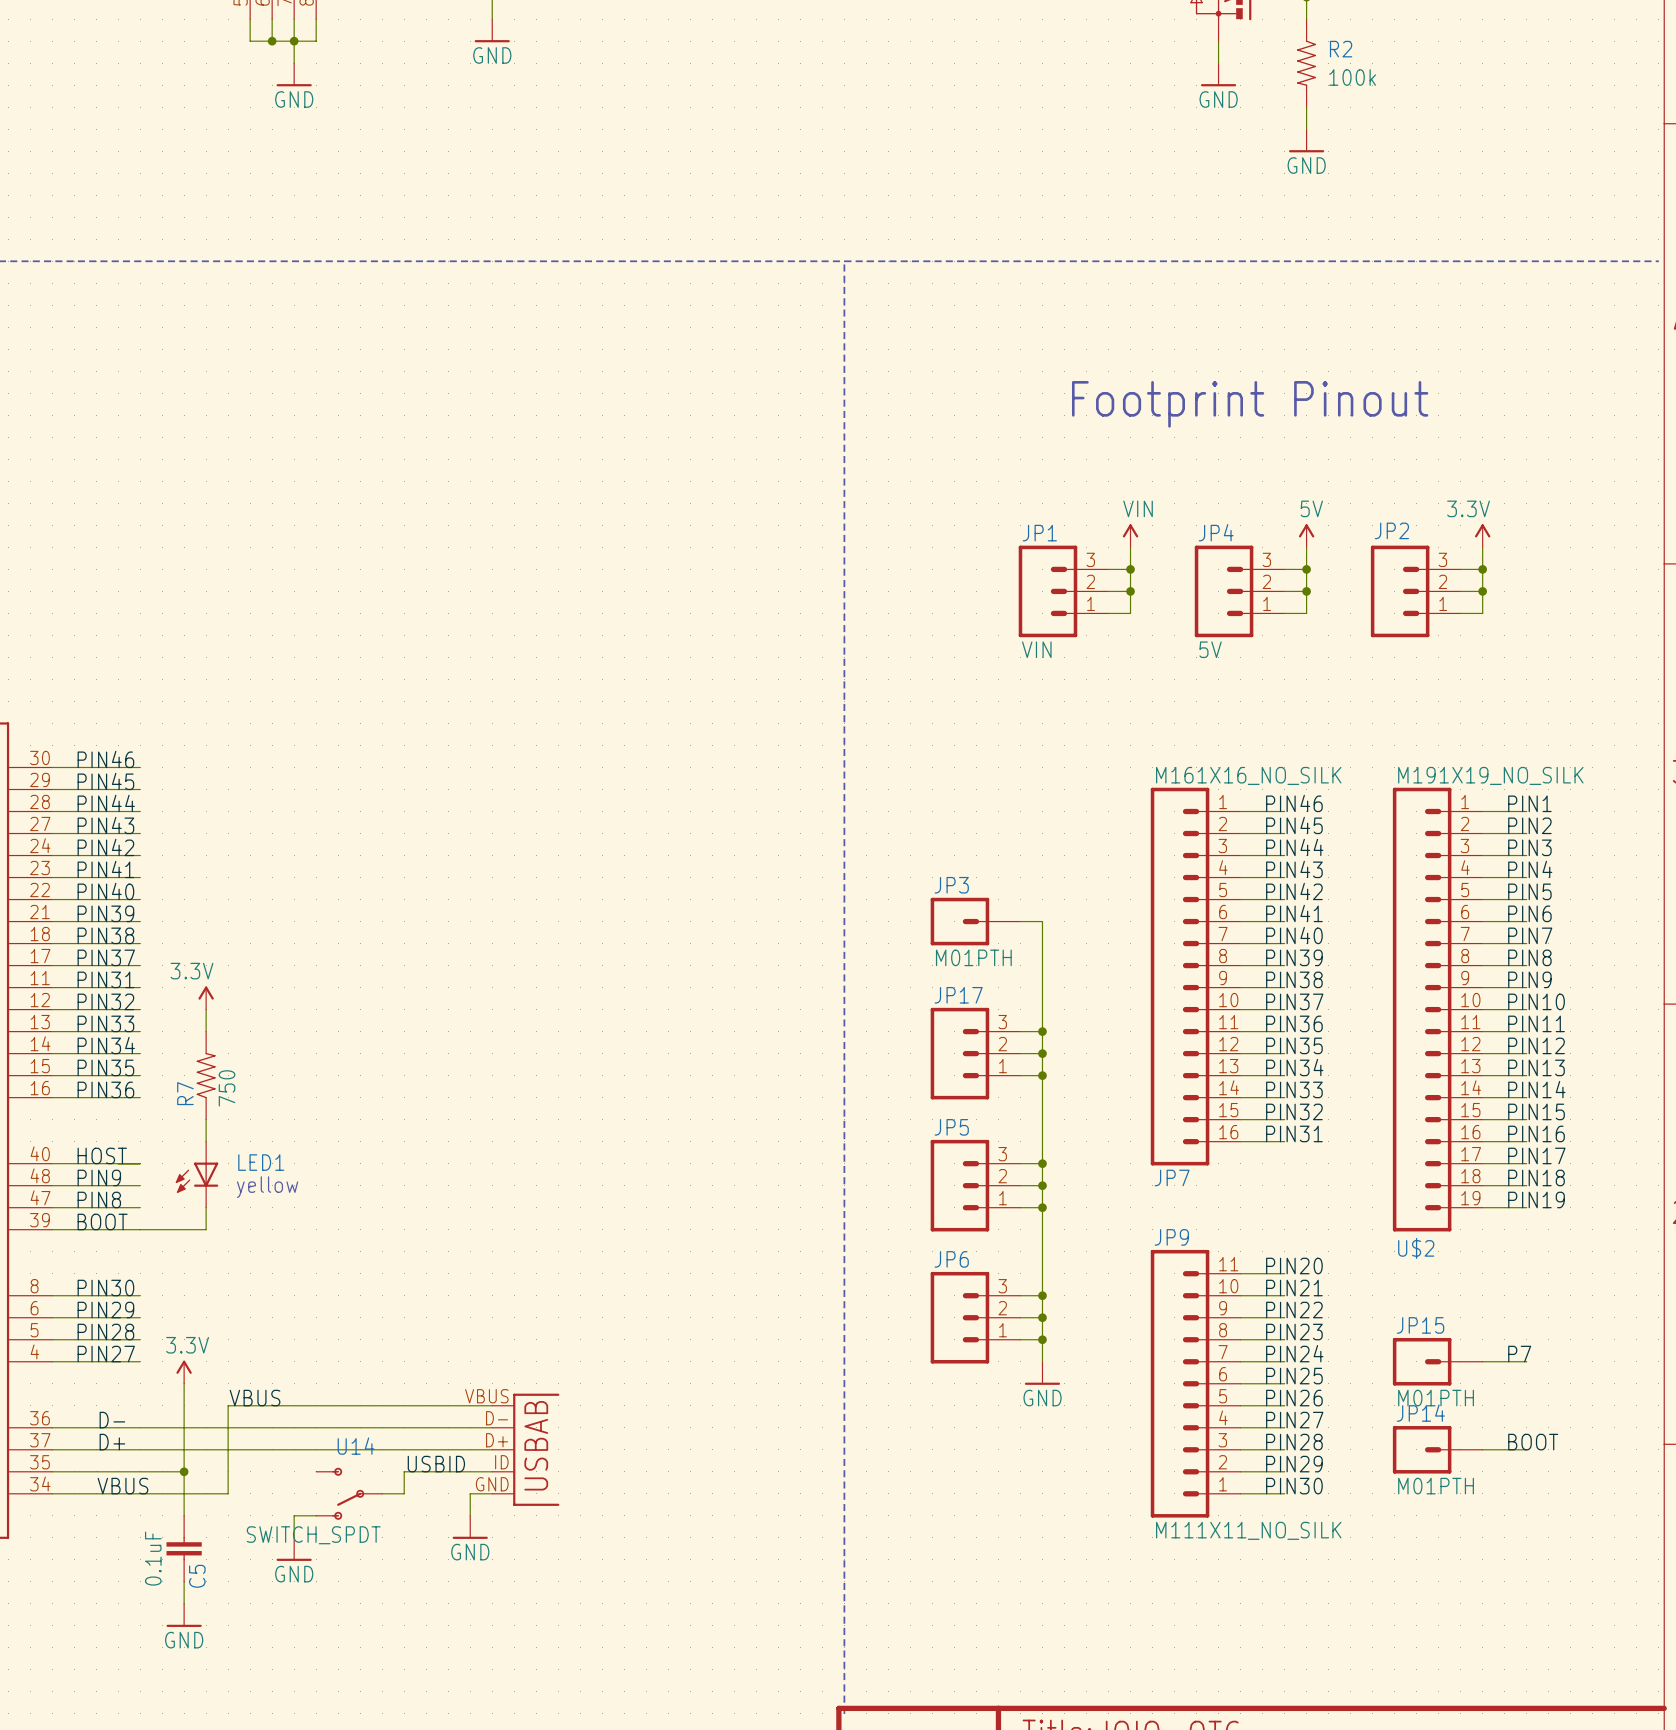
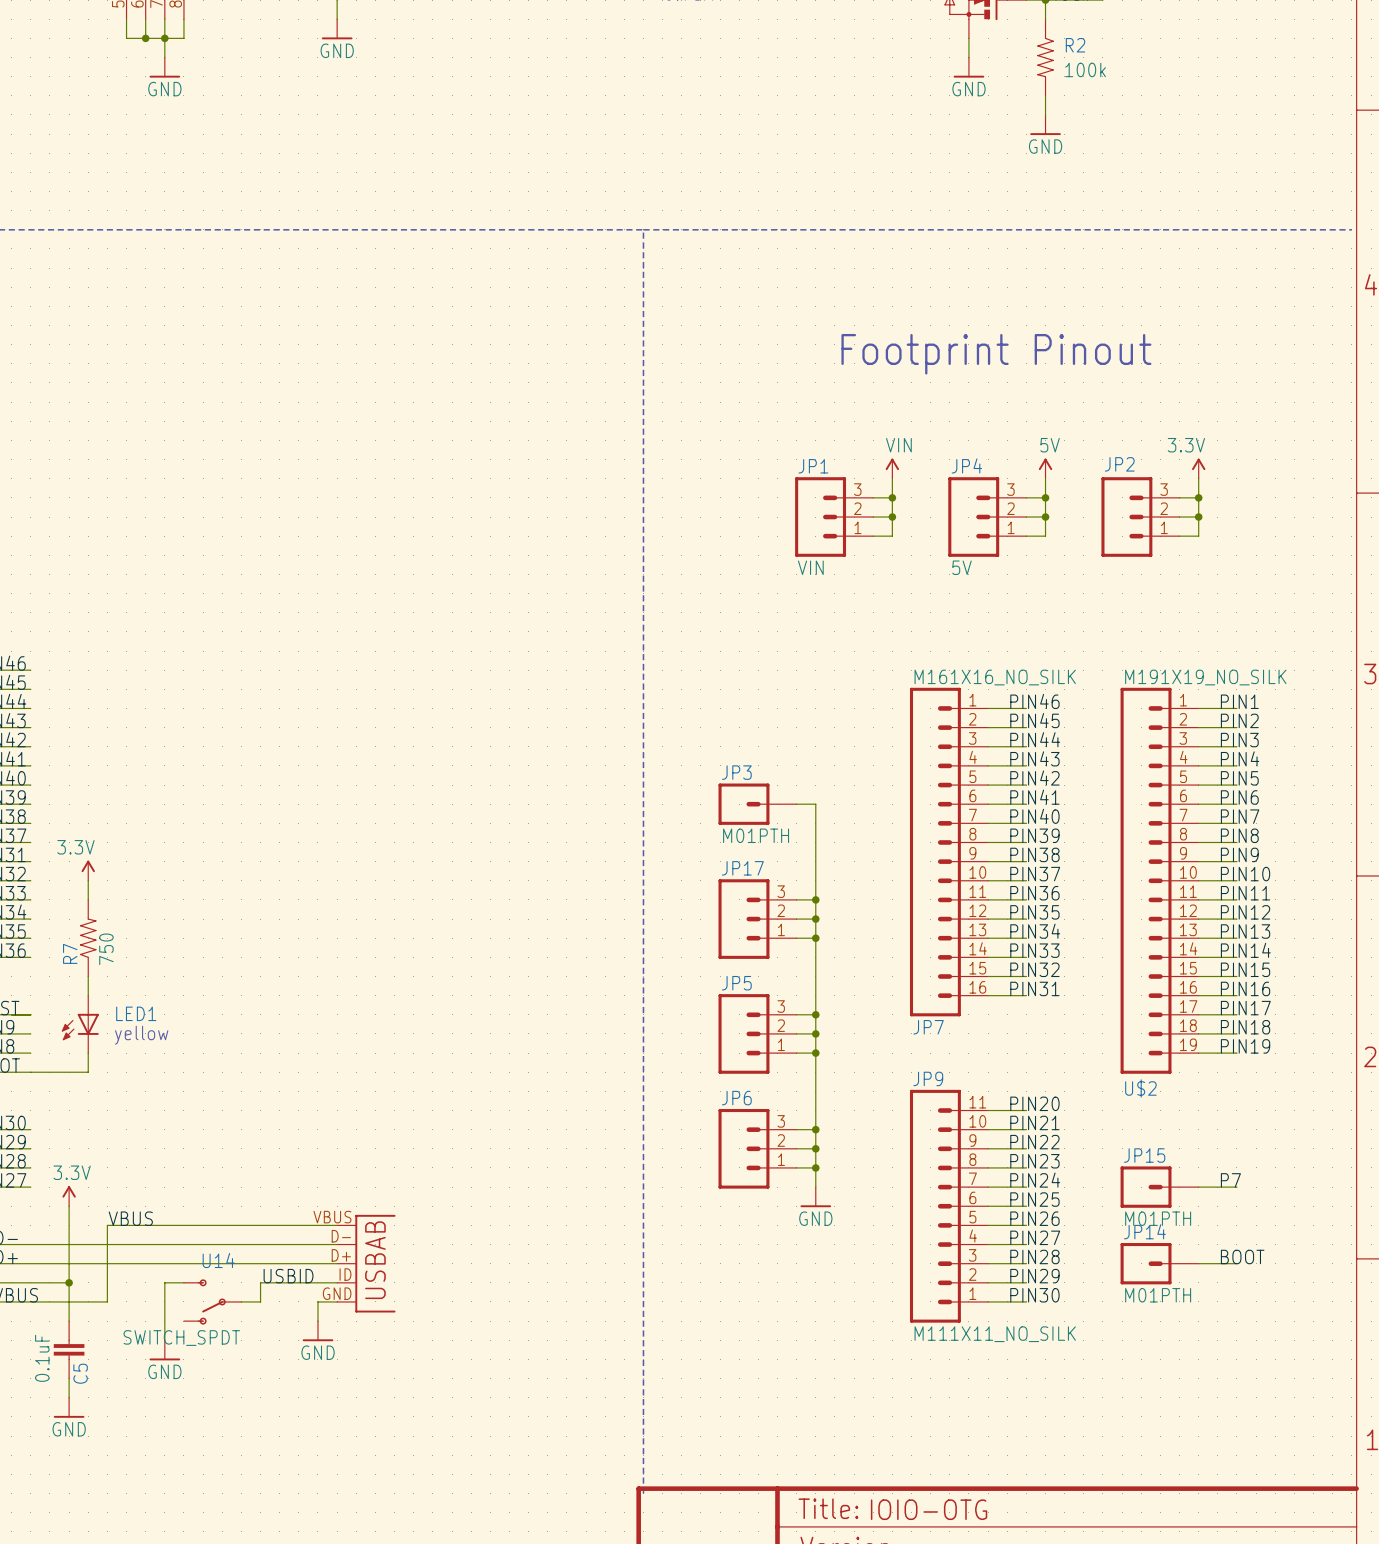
wire: (294, 1515) (316, 1515) -> (164, 1321) (164, 1282) (183, 1282)

